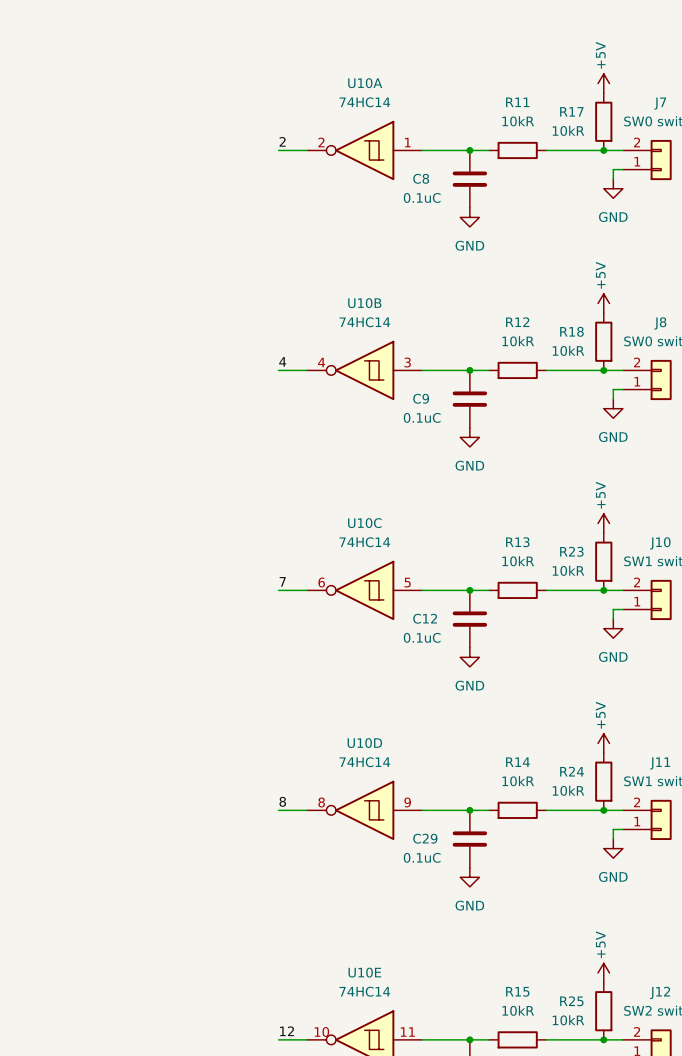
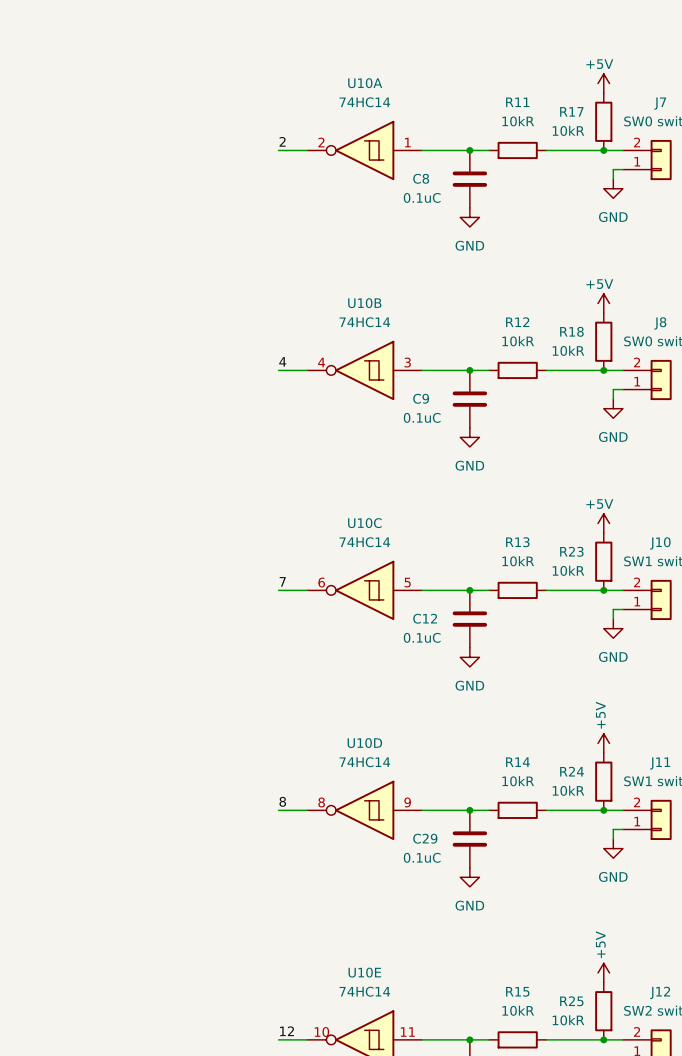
power symbol text rotation: 0° (600, 55) -> 90° clockwise (599, 64)
power symbol text rotation: 0° (600, 275) -> 90° clockwise (599, 284)
power symbol text rotation: 0° (600, 495) -> 90° clockwise (599, 504)

